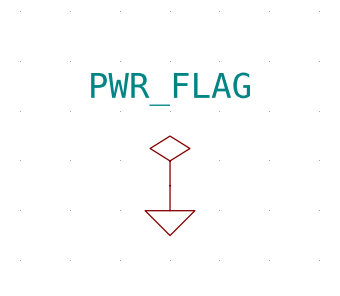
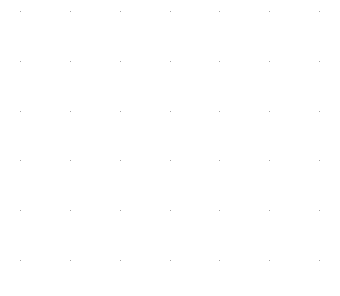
power symbol: PWR_FLAG (170, 160) -> none
power symbol: (170, 210) -> none

